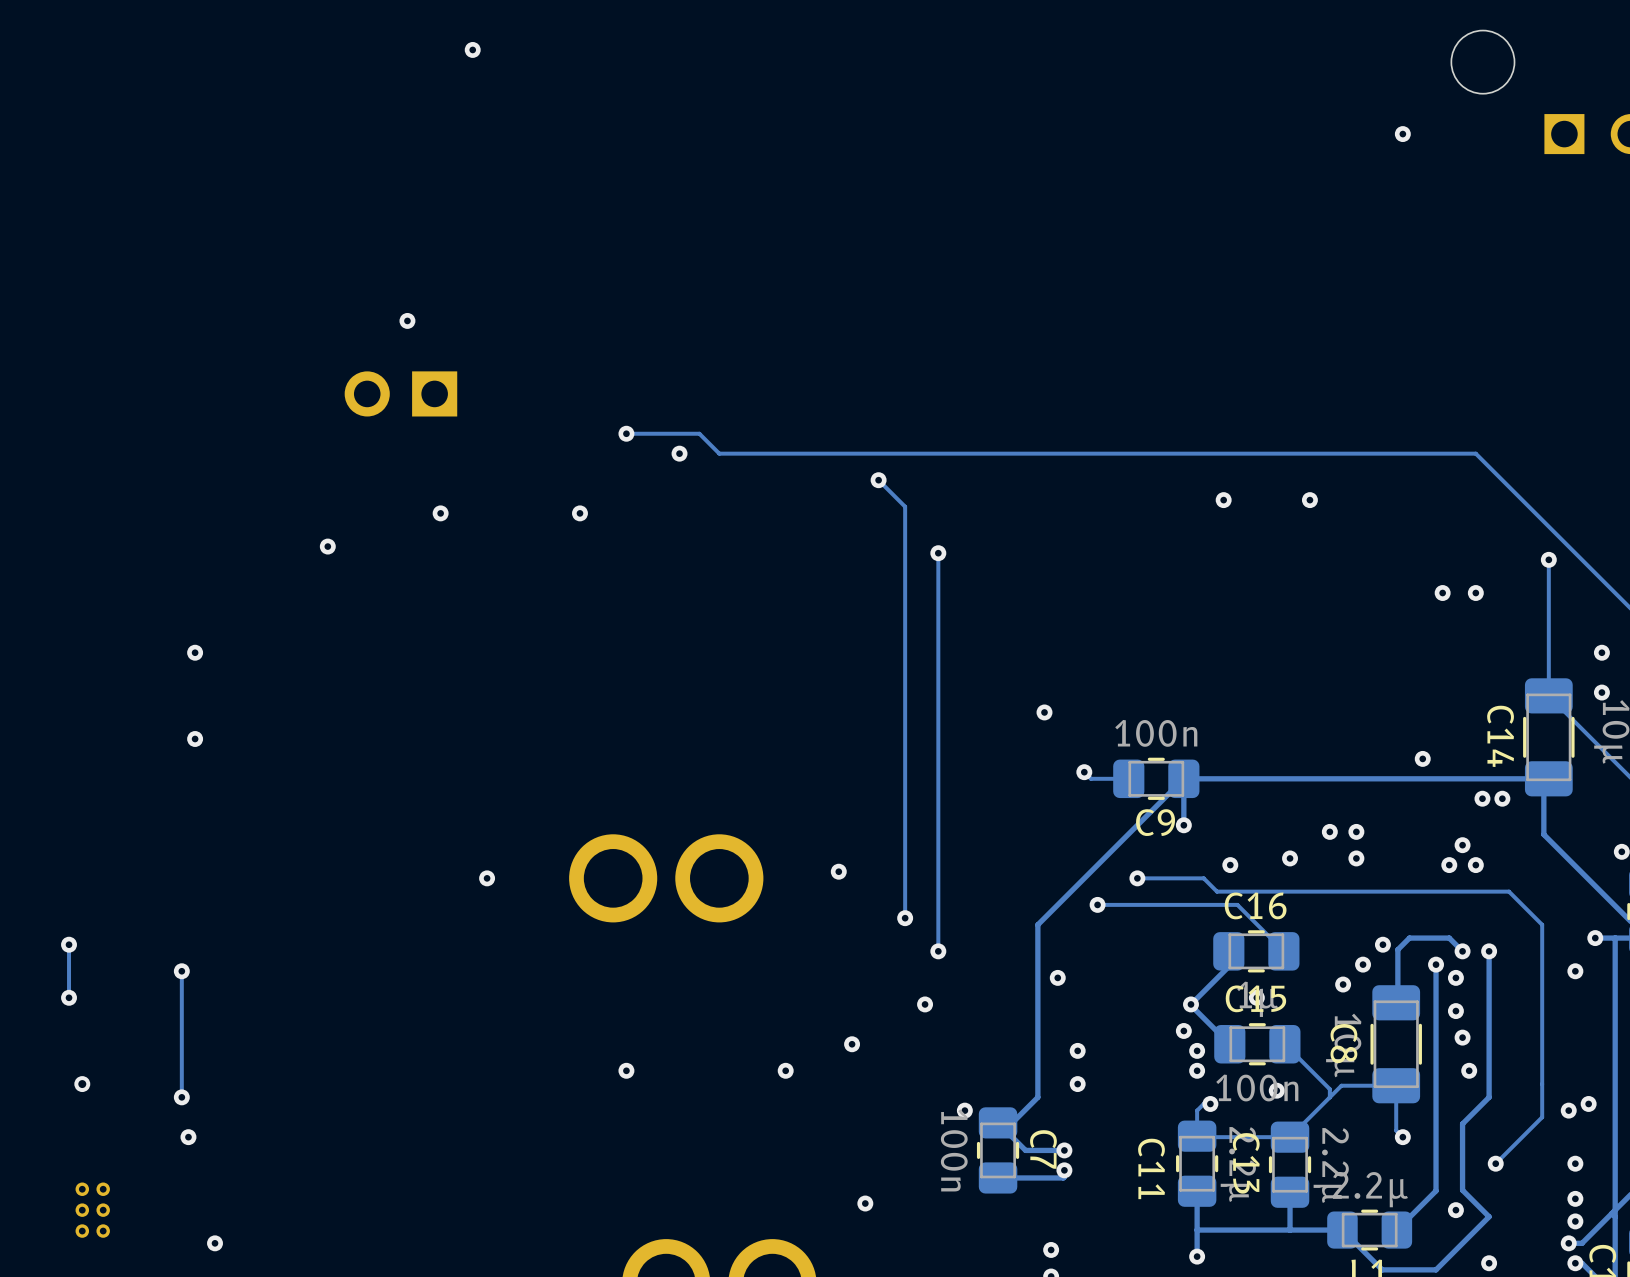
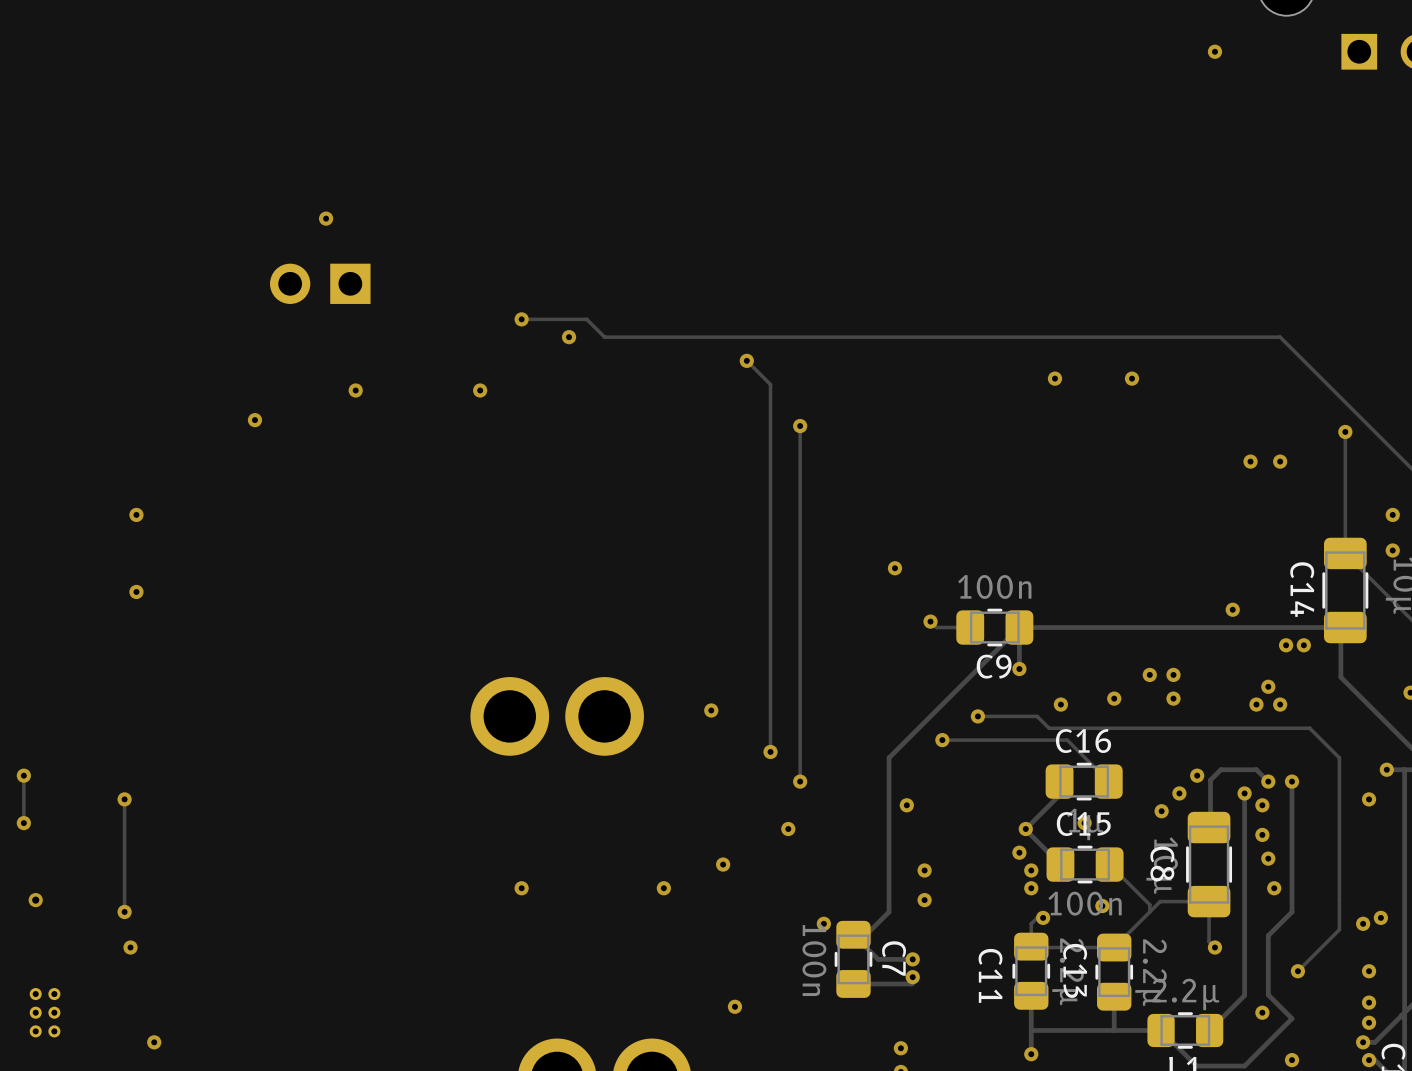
via: (487, 878) -> none

